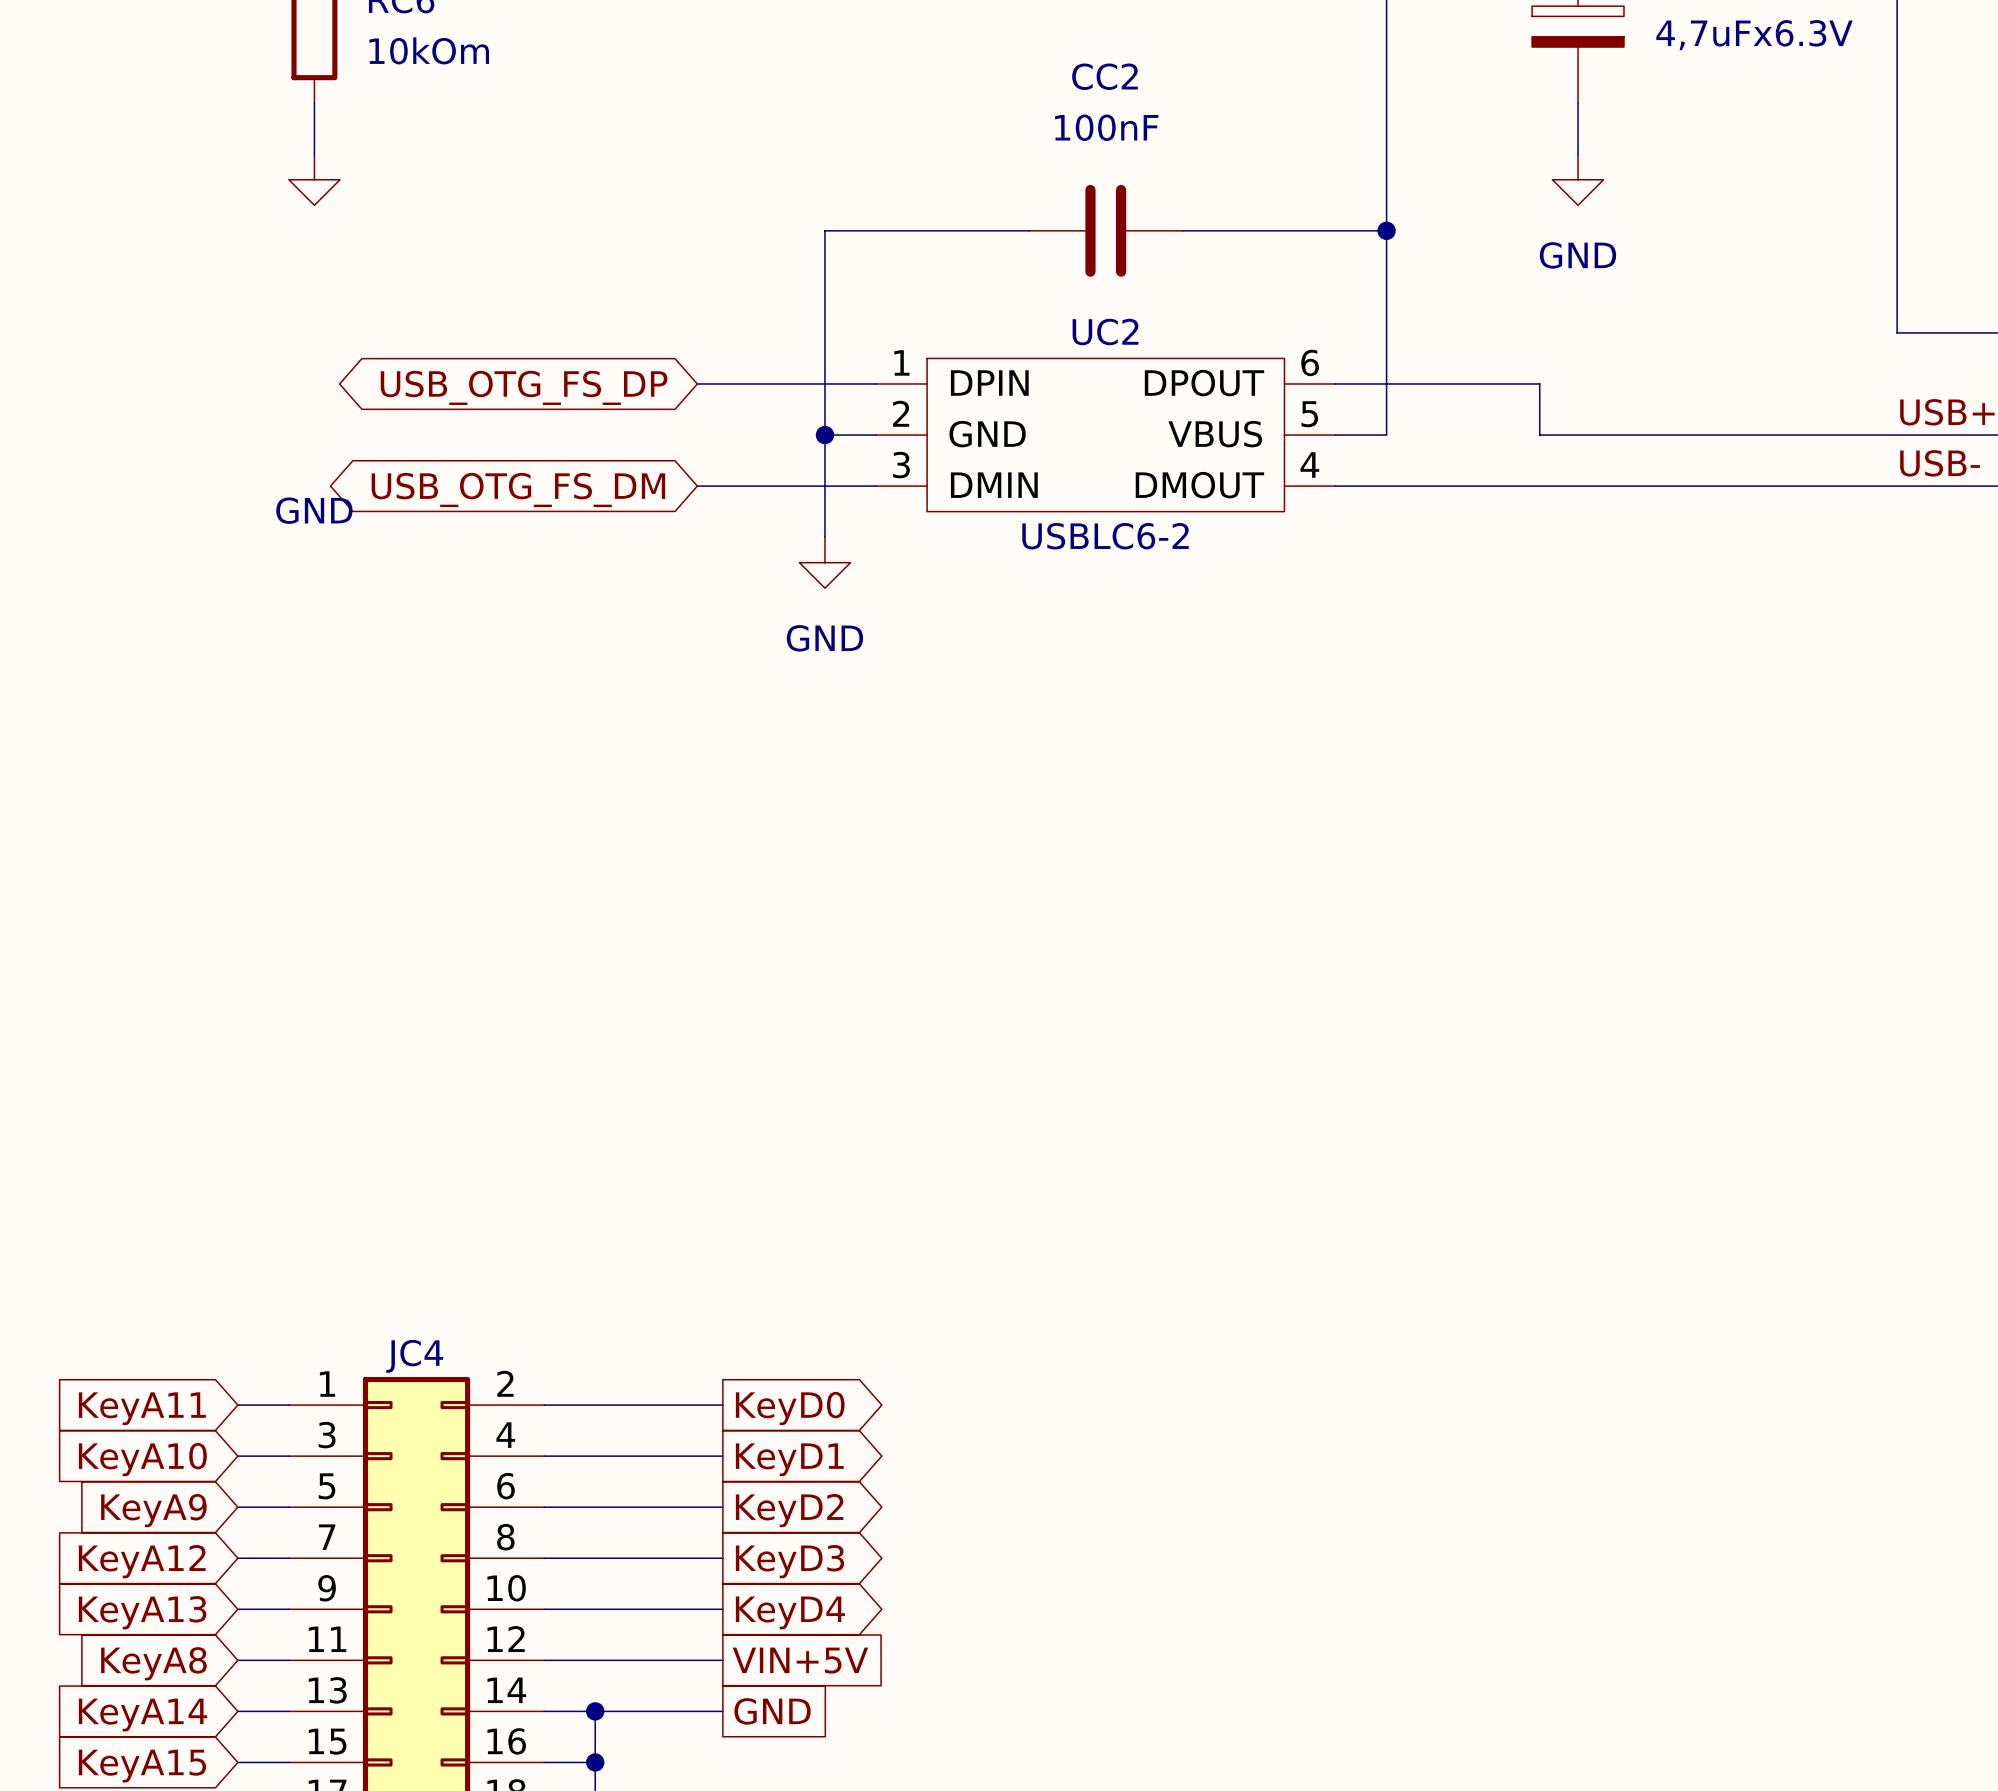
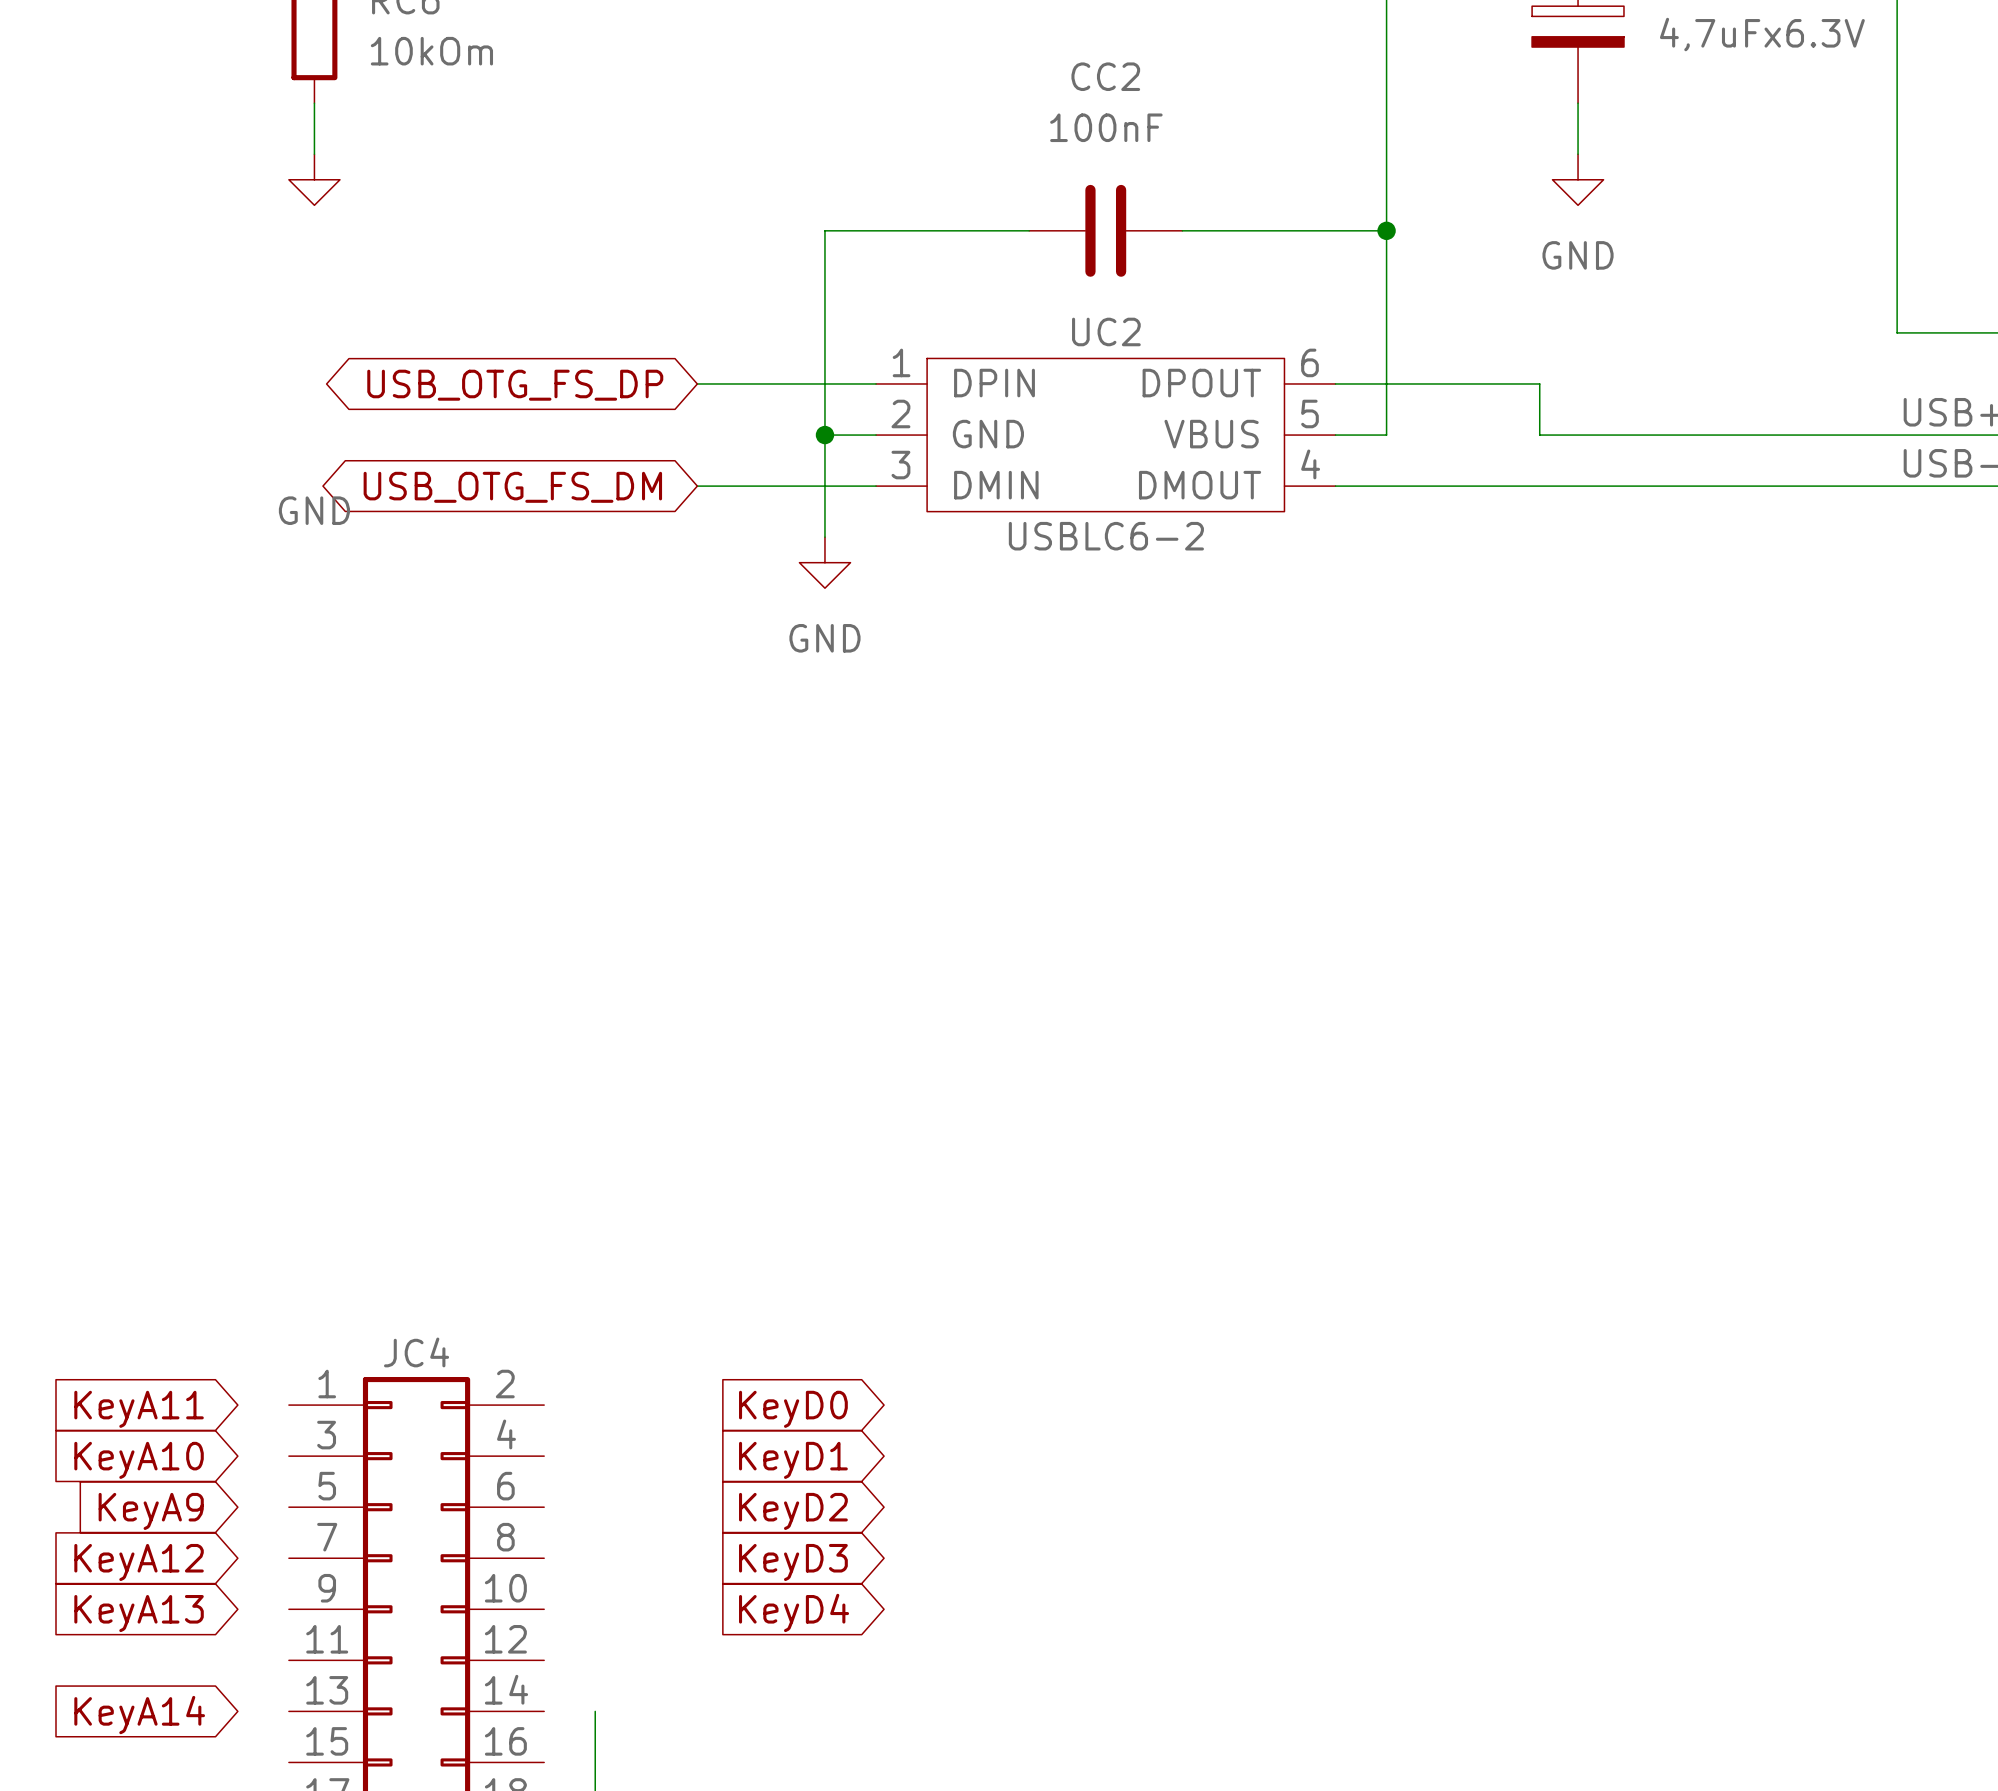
wire: (237, 1405) (288, 1405) -> none
wire: (544, 1405) (722, 1405) -> none
wire: (237, 1456) (288, 1456) -> none
wire: (544, 1456) (722, 1456) -> none
wire: (237, 1507) (288, 1507) -> none
wire: (544, 1507) (722, 1507) -> none
wire: (237, 1558) (288, 1558) -> none
wire: (544, 1558) (722, 1558) -> none
wire: (237, 1609) (288, 1609) -> none
wire: (544, 1609) (722, 1609) -> none
wire: (237, 1660) (288, 1660) -> none
wire: (544, 1660) (722, 1660) -> none
global label: VIN+5V (800, 1660) -> none
global label: KeyA8 (153, 1663) -> none
wire: (237, 1711) (288, 1711) -> none
wire: (544, 1711) (722, 1711) -> none
junction: (595, 1711) -> none
global label: GND (772, 1711) -> none
wire: (237, 1762) (288, 1762) -> none
wire: (544, 1762) (595, 1762) -> none
junction: (595, 1762) -> none
global label: KeyA15 (142, 1766) -> none

